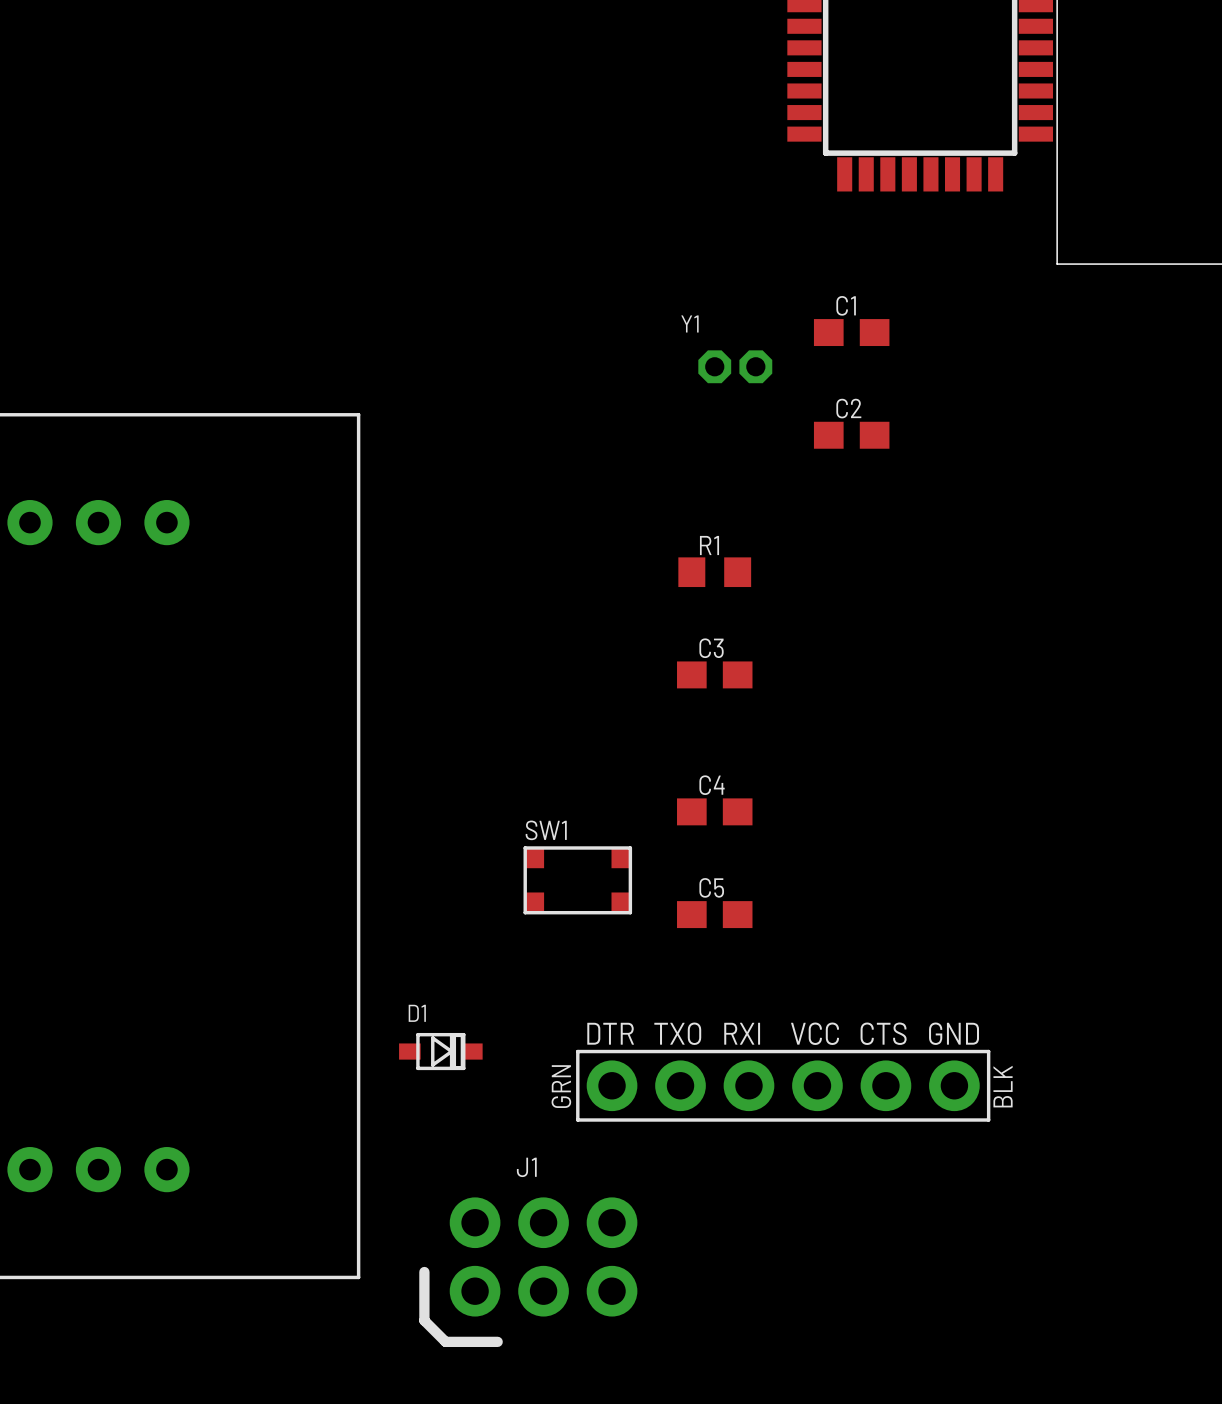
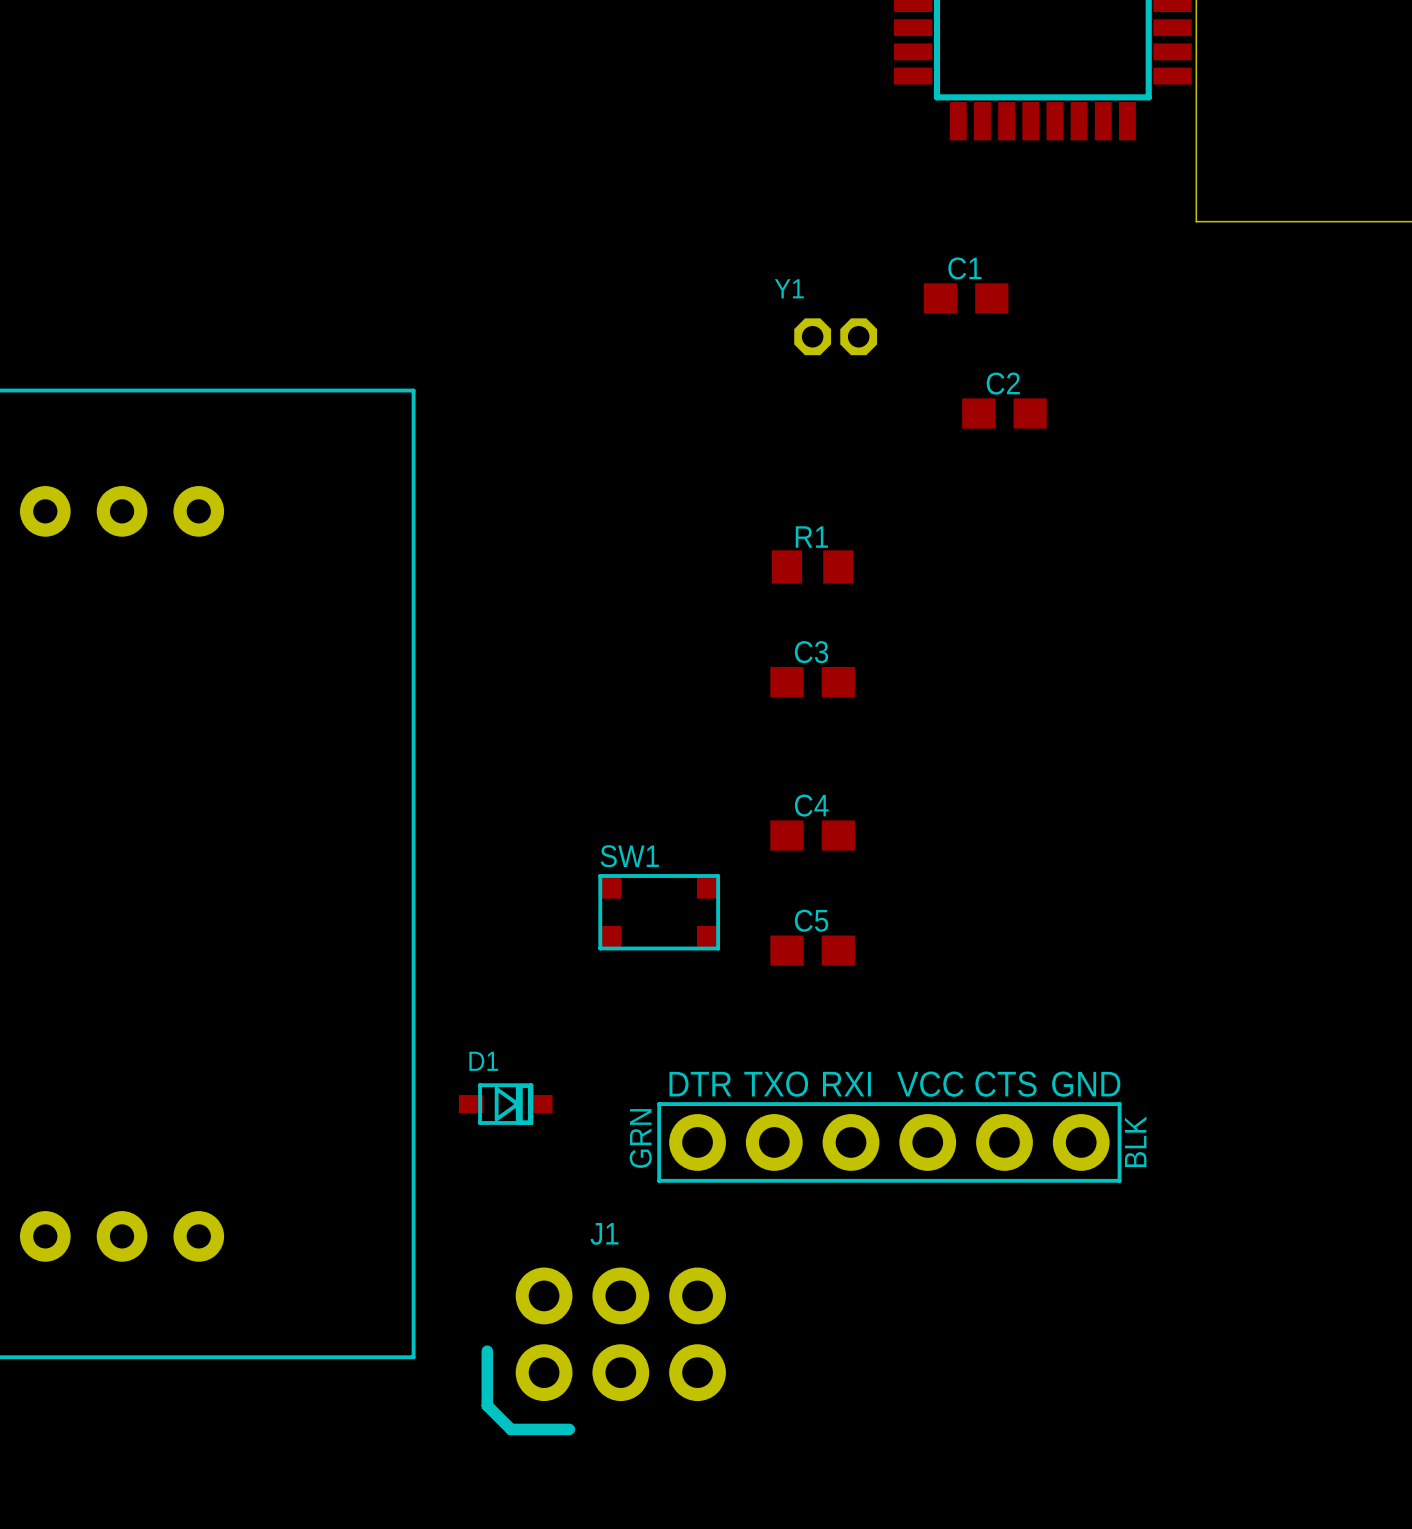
C2 position: (851, 435) -> (1004, 413)

